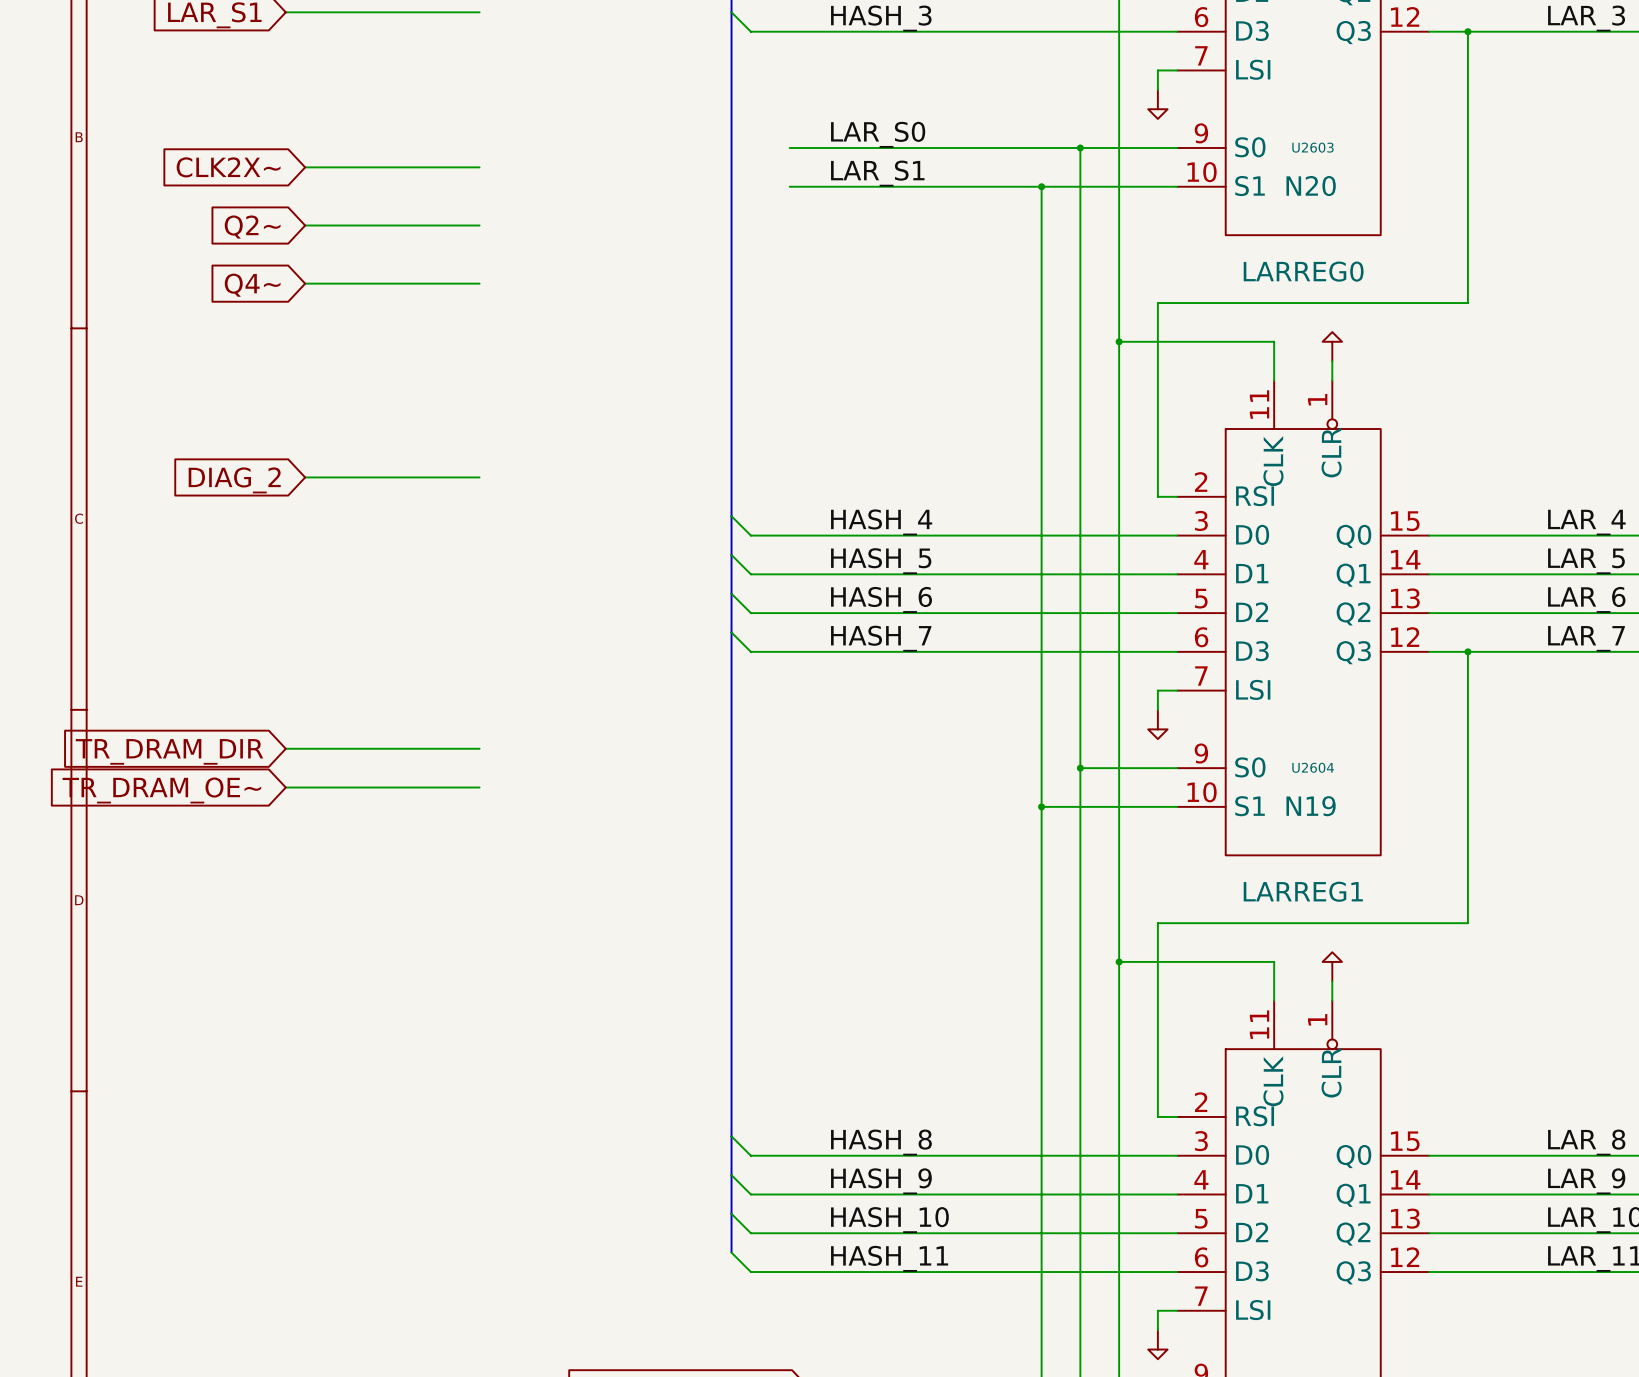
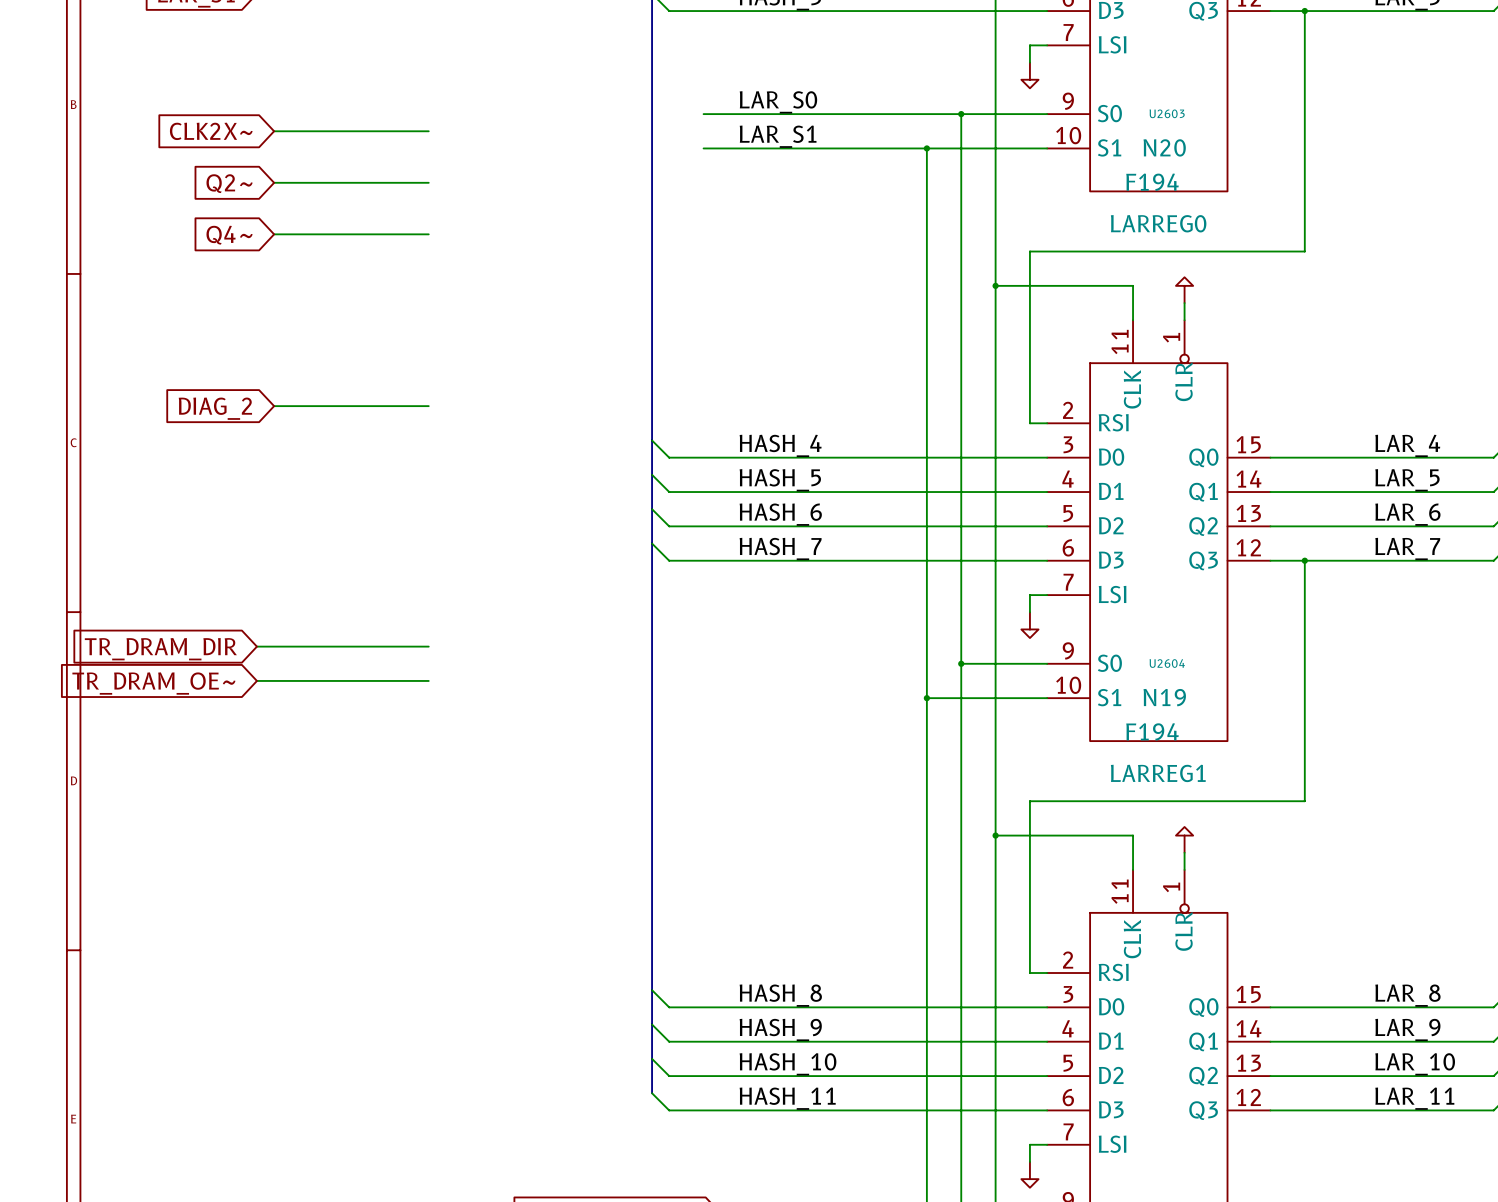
U2603 value: none -> F194 (1152, 182)
U2604 value: none -> F194 (1152, 731)

